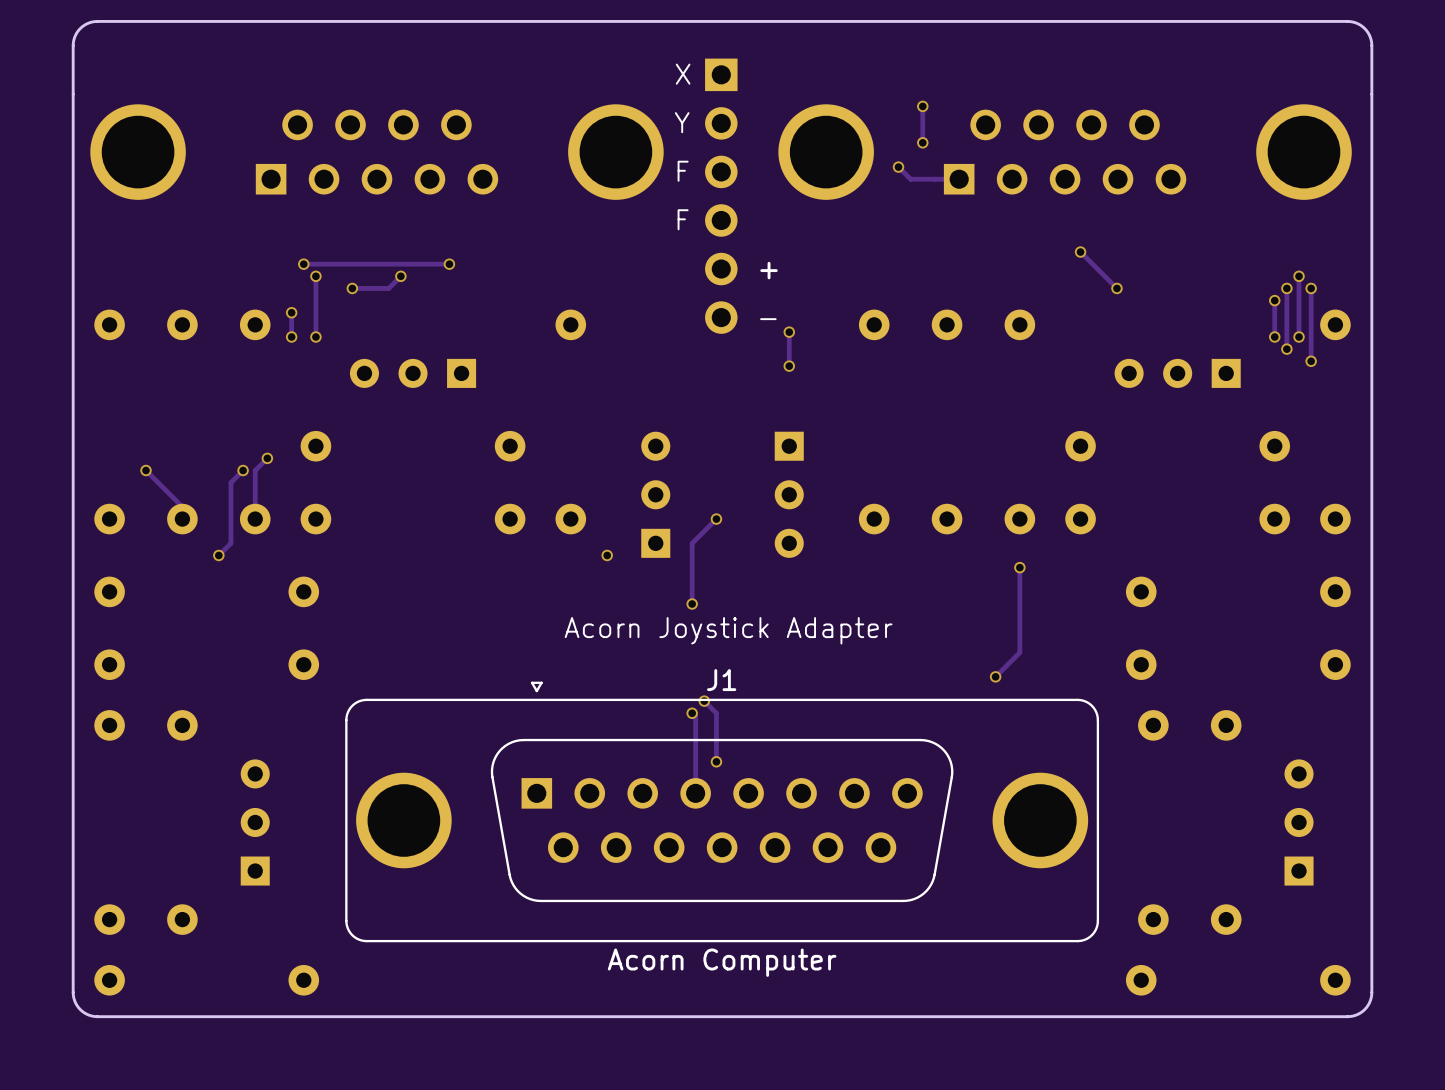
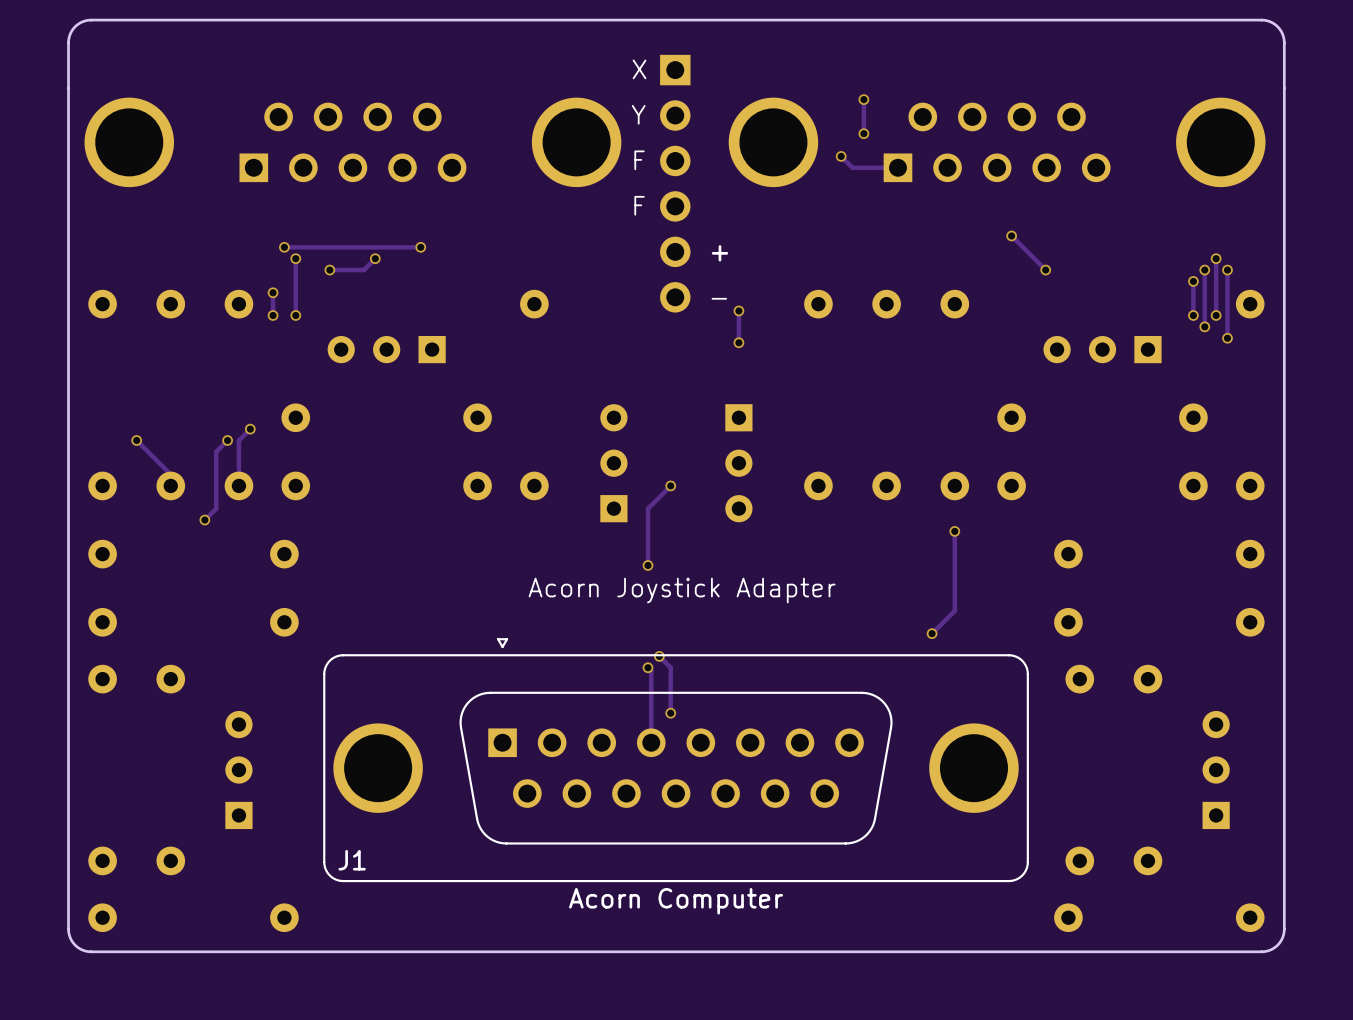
via: (607, 555) -> none
J1 name position: J1 (721, 680) -> J1 (352, 860)

